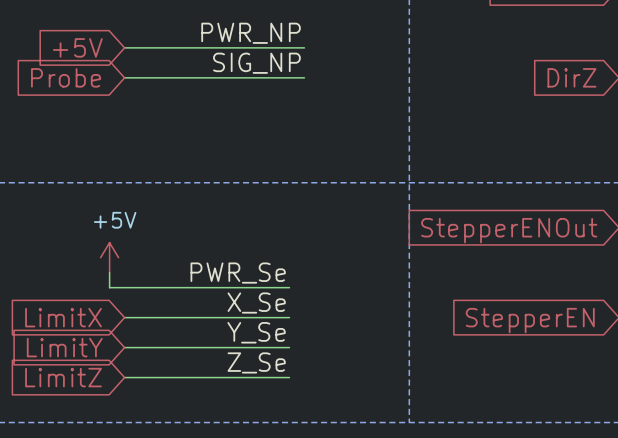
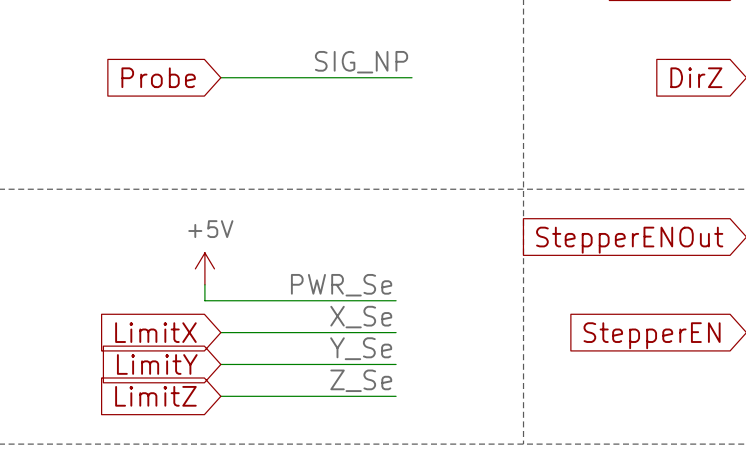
label: PWR_NP (251, 33) -> none
global label: +5V (77, 47) -> none
wire: (124, 47) (304, 47) -> none

